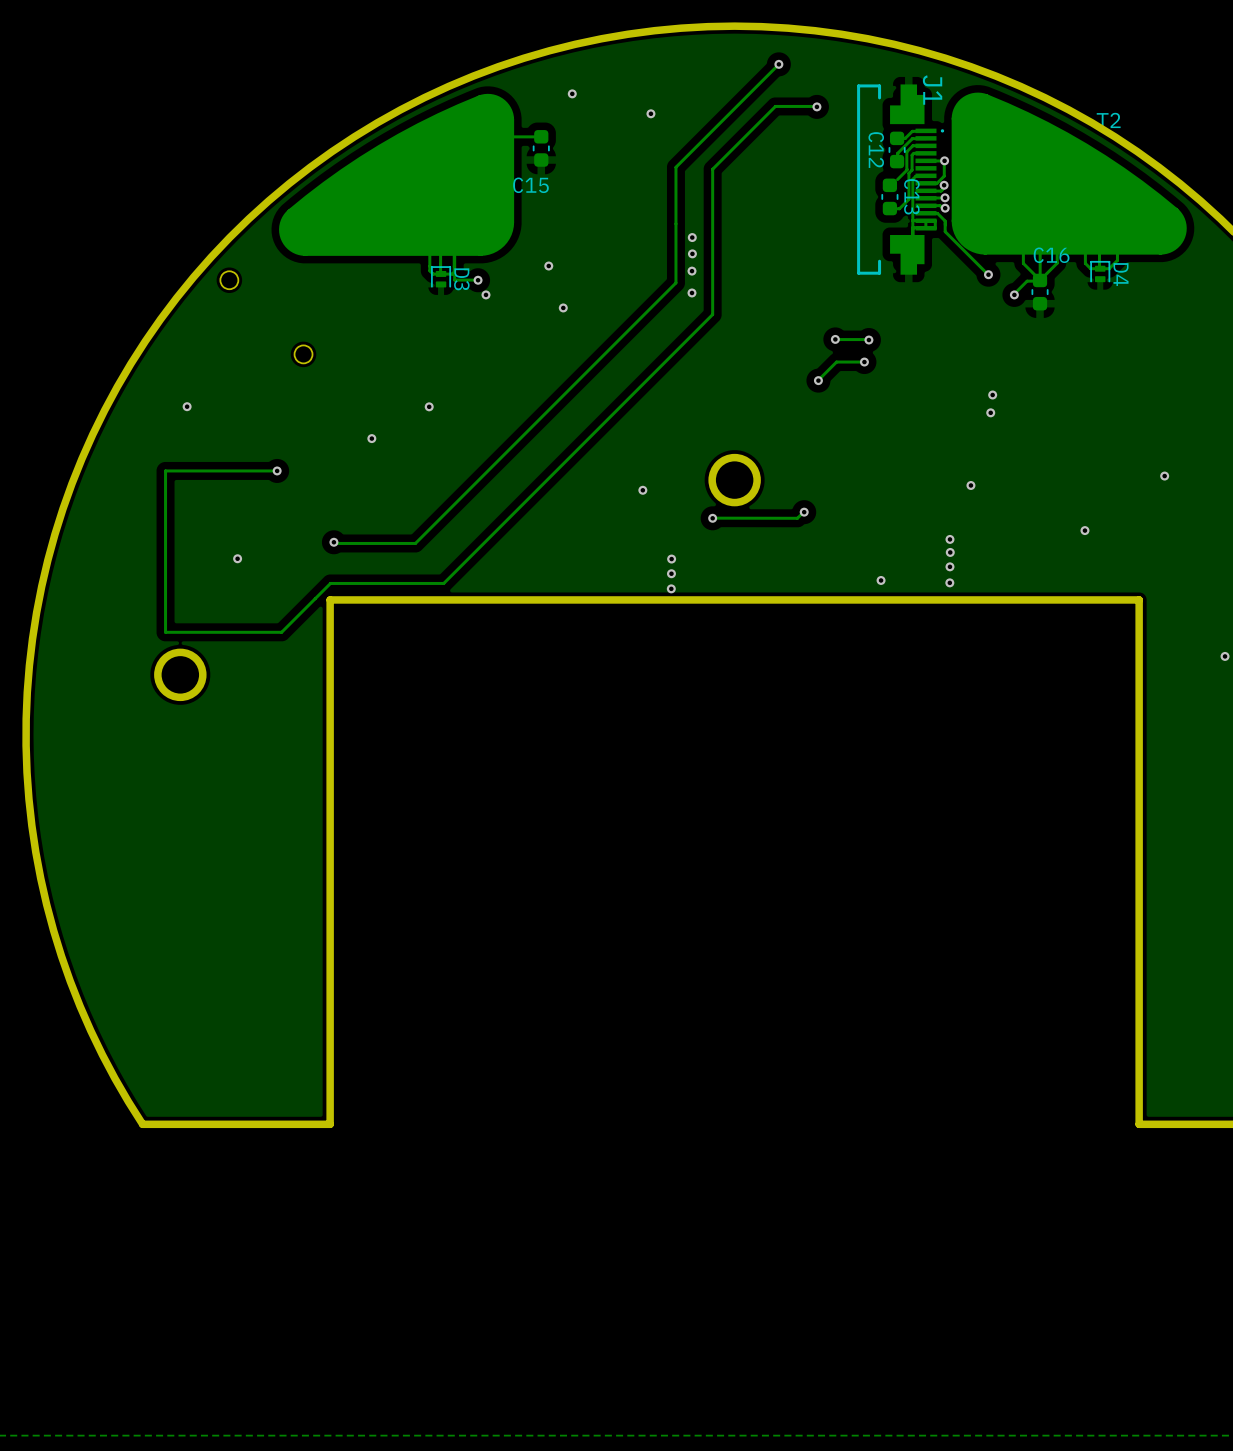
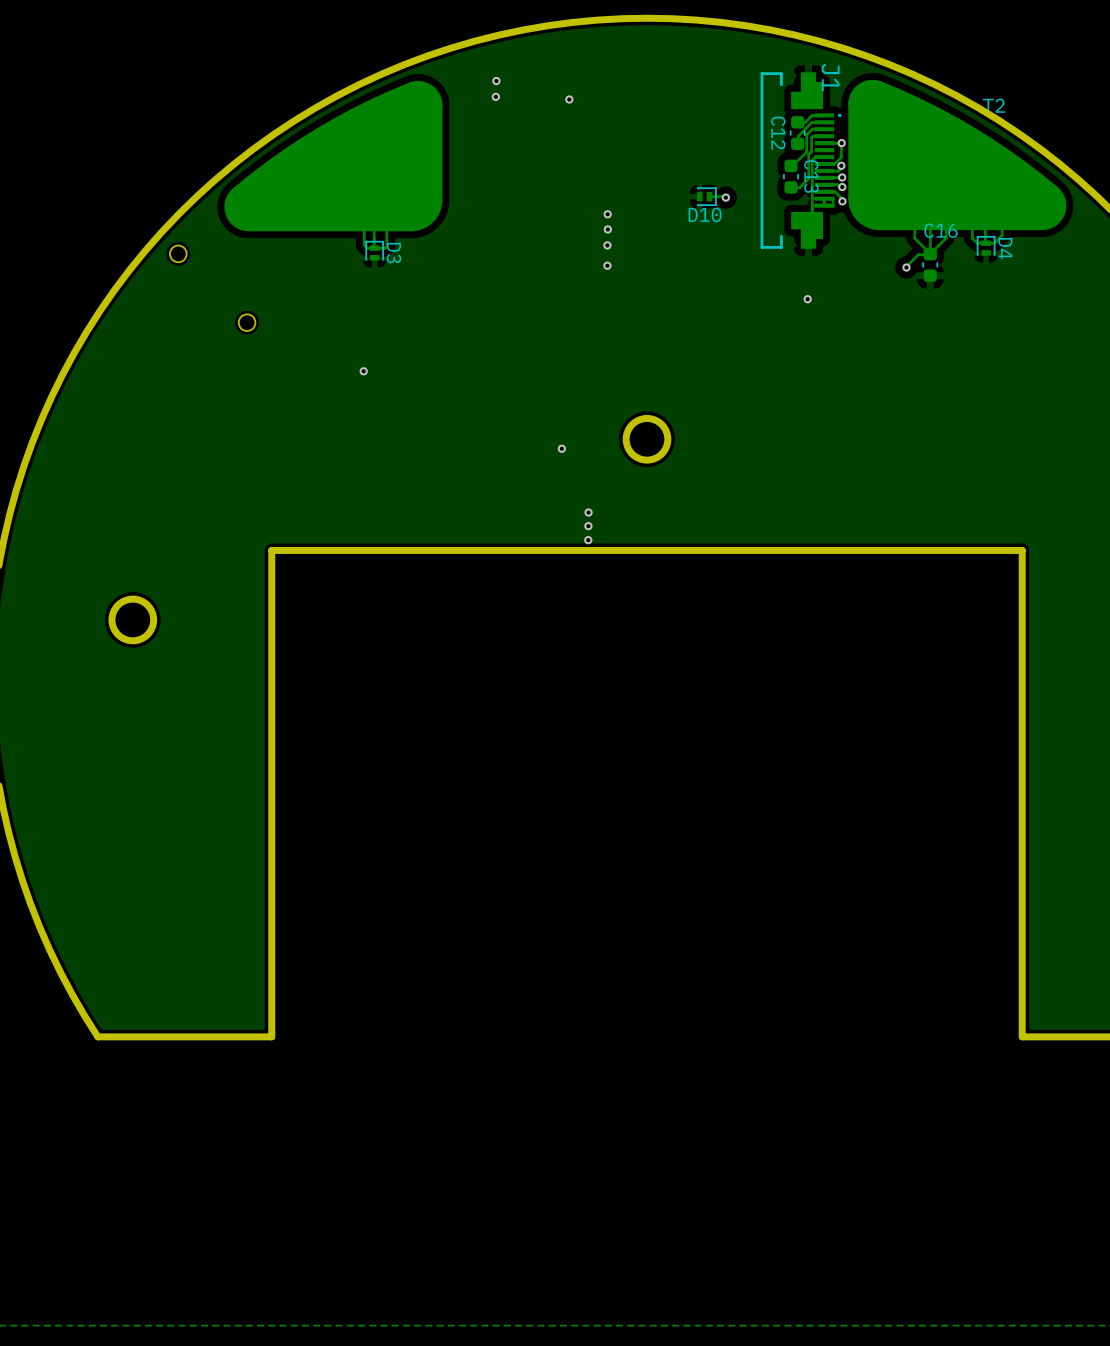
track: (778, 64) (675, 167) (675, 282) (415, 543) (334, 543) -> none
via: (778, 64) -> none
track: (816, 106) (775, 106) (712, 169) (712, 314) (443, 583) (330, 583) (281, 632) (165, 632) (165, 470) (277, 470) -> none
via: (816, 106) -> none
via: none -> (495, 96)
track: (541, 136) (506, 136) -> none
C15: (541, 148) -> none
D10: none -> (706, 196)
track: none -> (726, 196) (709, 196)
via: none -> (725, 197)
track: (945, 221) (945, 231) (988, 274) -> none
via: none -> (842, 201)
track: (454, 252) (454, 280) (477, 280) -> none
via: (548, 266) -> none
via: (988, 274) -> none
via: (478, 280) -> none
via: (485, 294) -> none
via: (563, 307) -> none
via: none -> (807, 299)
via: (835, 339) -> none
track: (868, 339) (834, 339) -> none
via: (868, 340) -> none
track: (864, 362) (836, 362) (817, 380) -> none
via: (864, 362) -> none
via: (818, 380) -> none
via: (992, 395) -> none
via: (187, 406) -> none
via: (990, 412) -> none
via: (371, 438) -> none
via: (277, 470) -> none
via: (1164, 476) -> none
via: (970, 485) -> none
track: (803, 512) (797, 518) (712, 518) -> none
via: (804, 512) -> none
via: (712, 518) -> none
via: (1084, 530) -> none
via: (949, 539) -> none
via: (333, 542) -> none
via: (950, 552) -> none
via: (237, 558) -> none
via: (949, 566) -> none
via: (881, 580) -> none
via: (949, 582) -> none
via: (1225, 656) -> none

